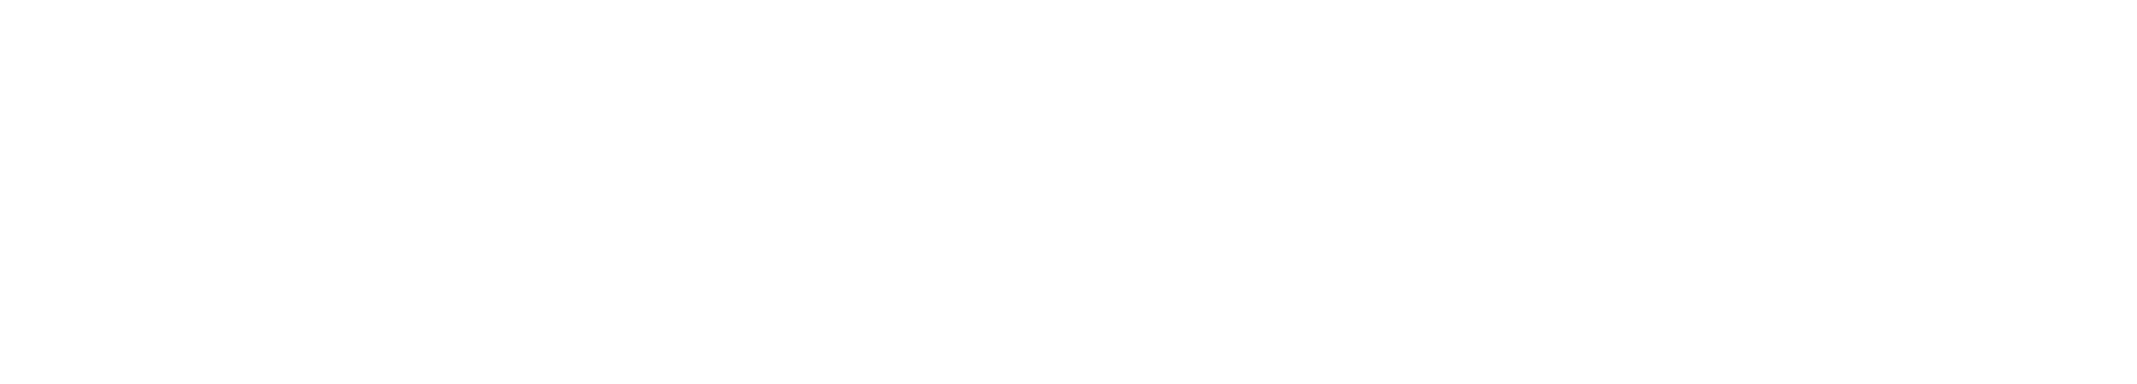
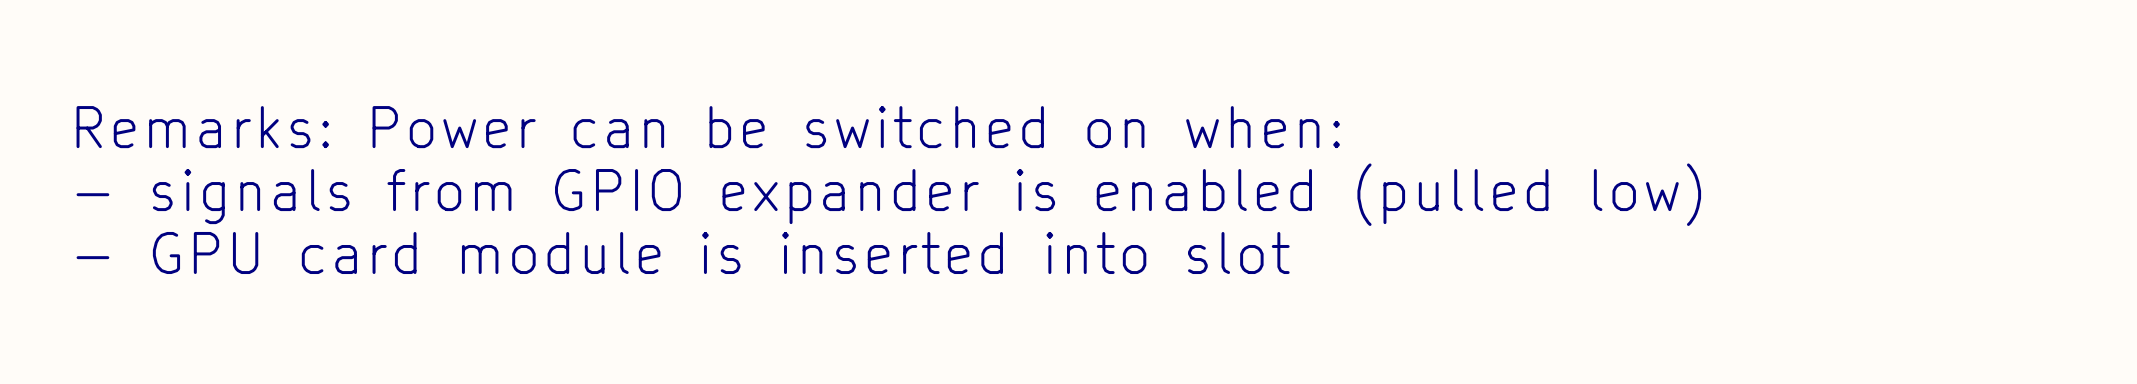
text: none -> Remarks: Power can be switched on when: (708, 127)
text: none -> - signals from GPIO expander is enabled (pulled low) (888, 194)
text: none -> - GPU card module is inserted into slot (683, 252)

